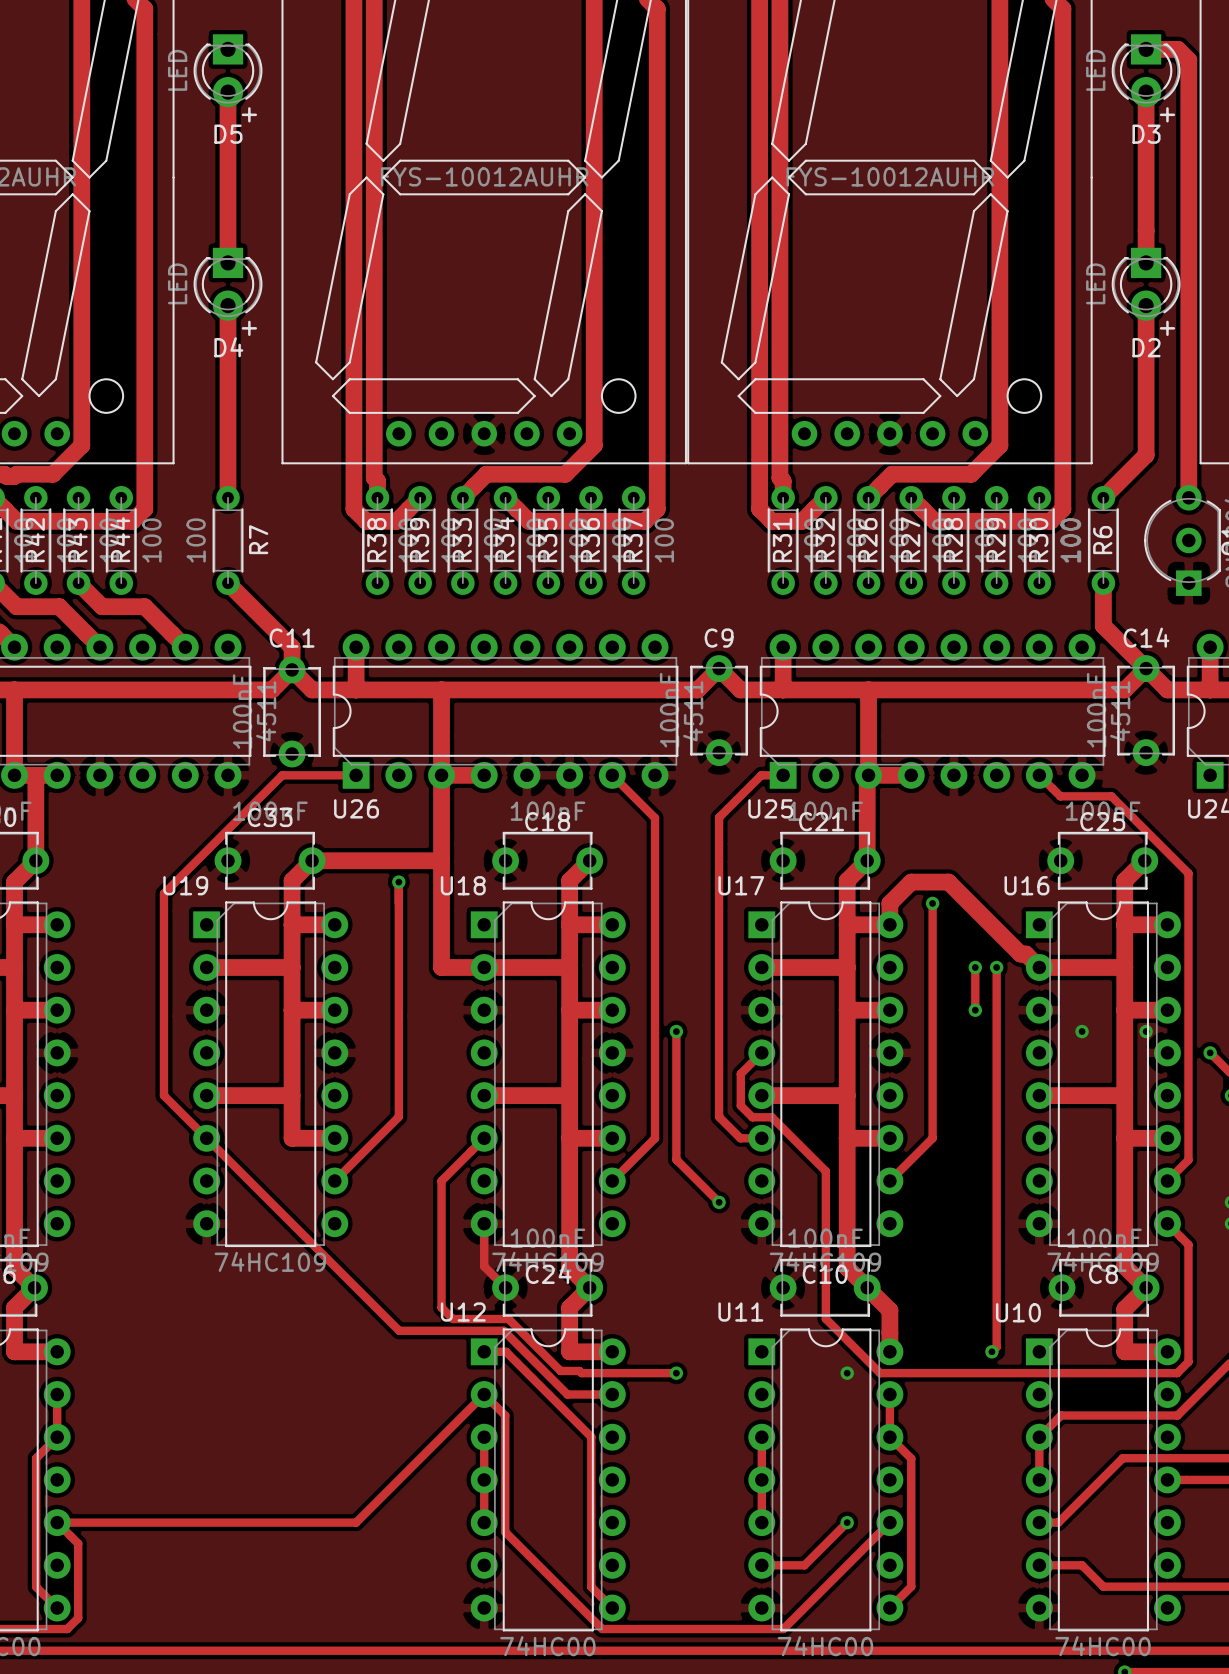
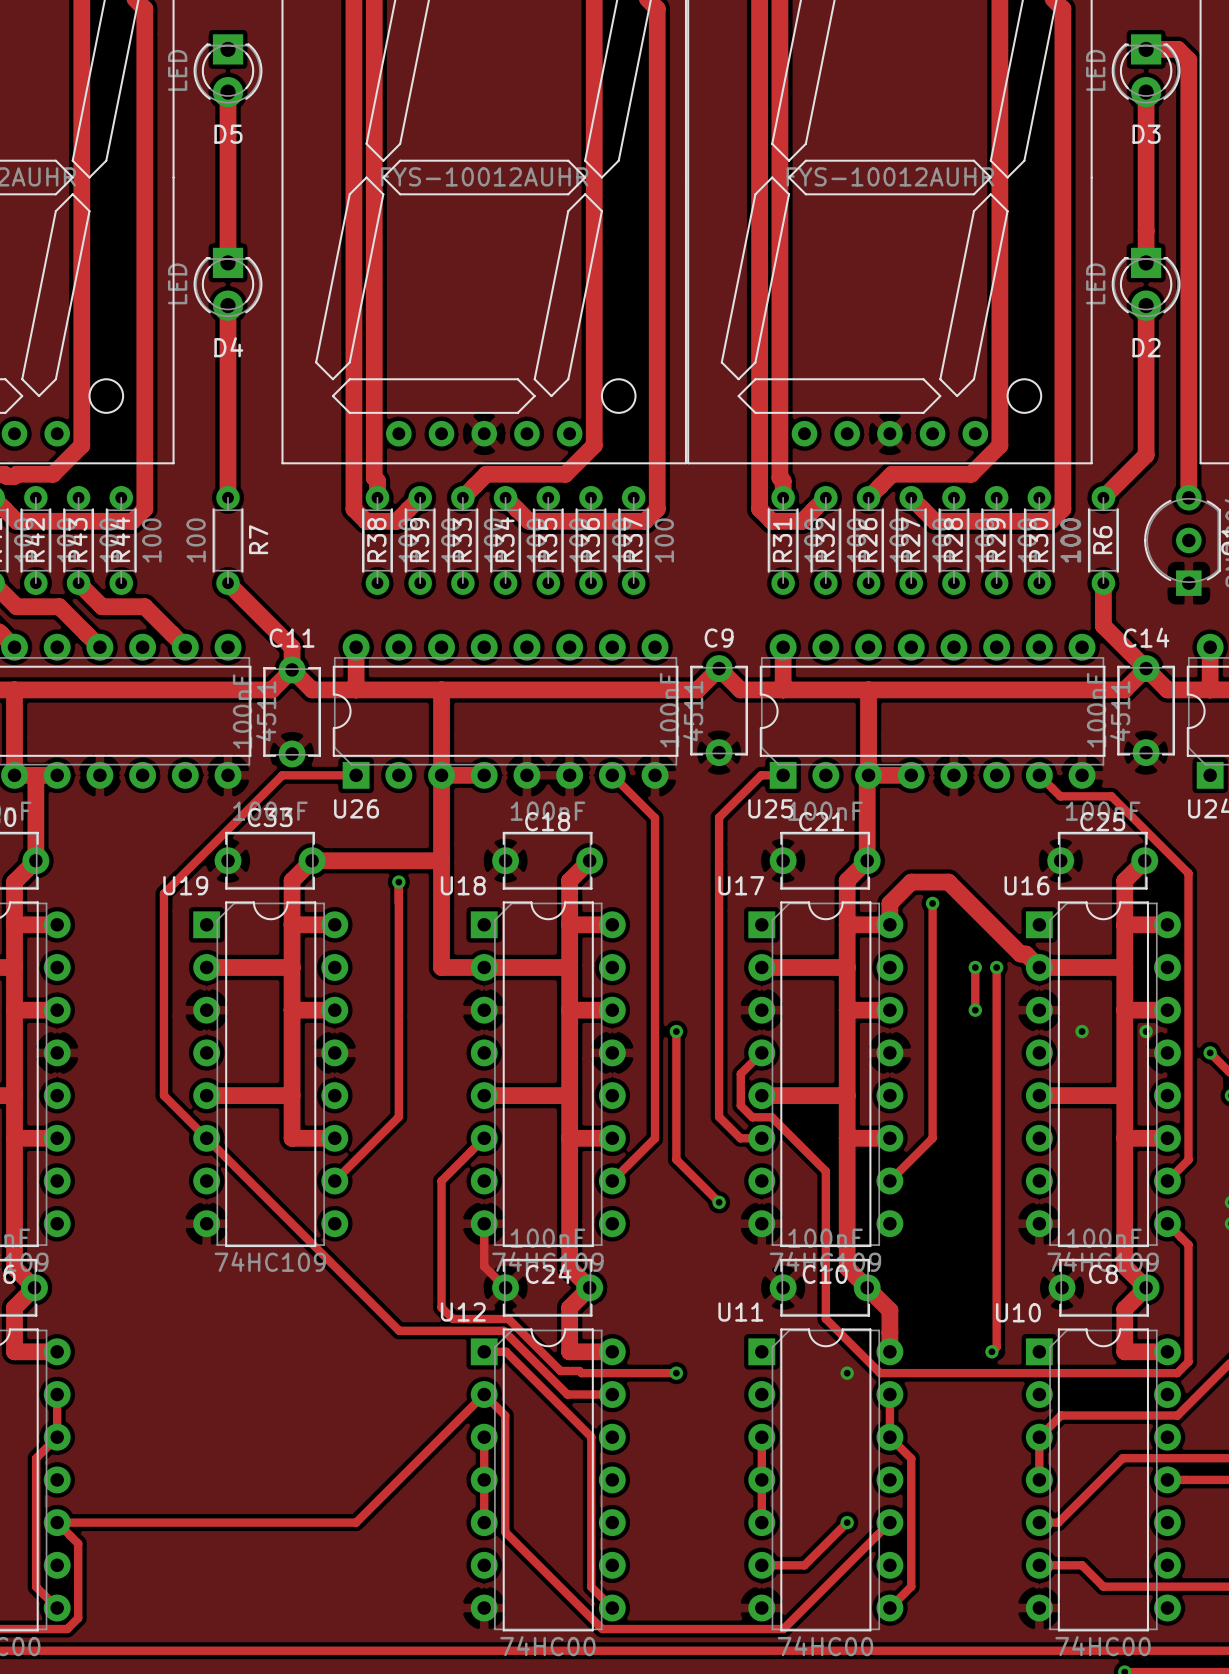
text: + (249, 114) -> none
text: + (1167, 114) -> none
text: + (249, 328) -> none
text: + (1167, 328) -> none

